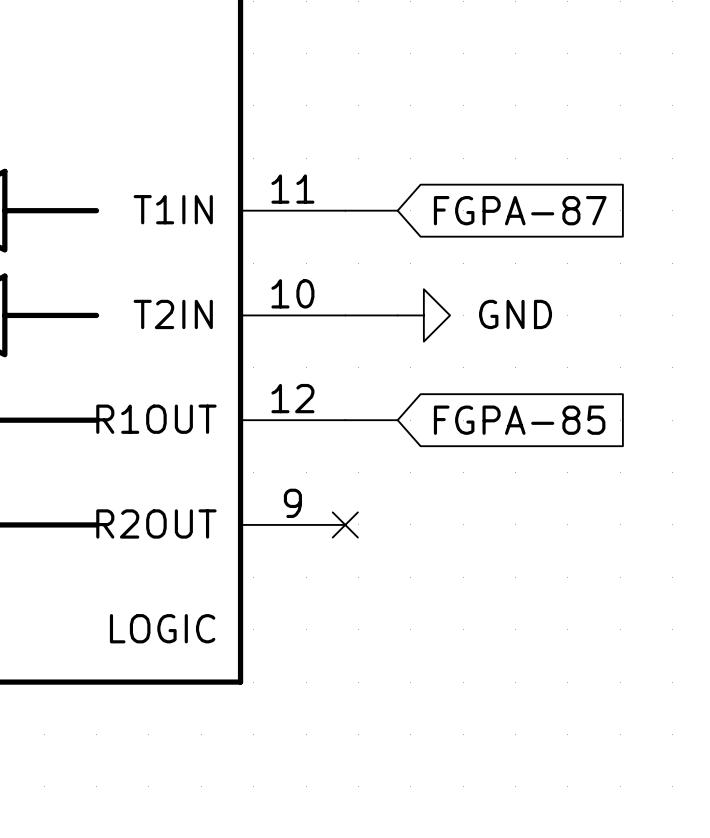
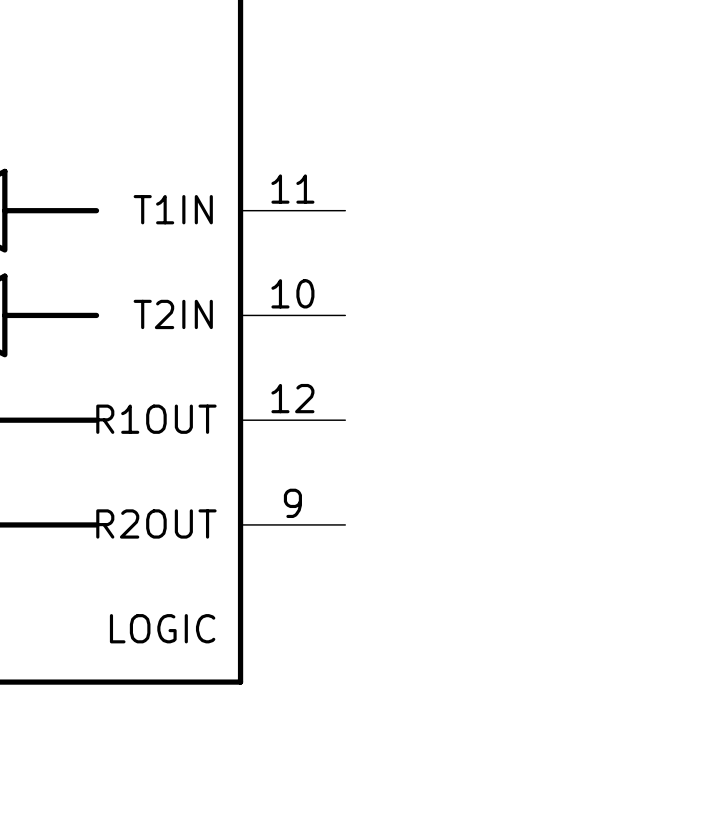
wire: (345, 210) (397, 210) -> none
global label: FGPA-87 (520, 210) -> none
wire: (345, 315) (397, 315) -> none
power symbol: GND (423, 315) -> none
wire: (345, 420) (397, 420) -> none
global label: FGPA-85 (519, 420) -> none
no-connect mark: (345, 524) -> none

